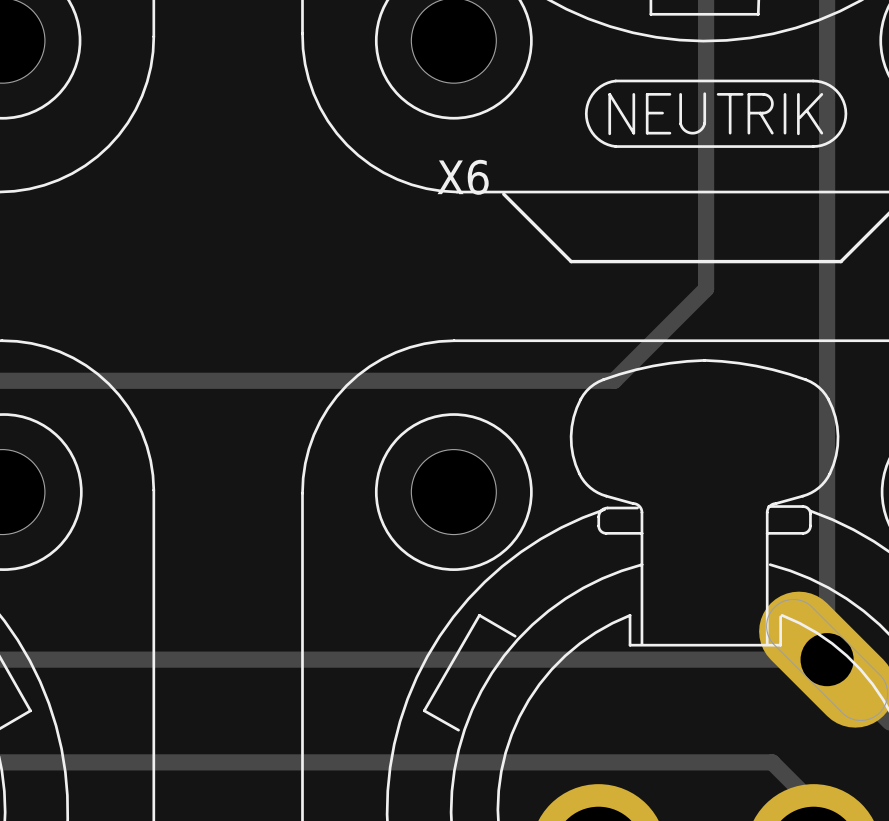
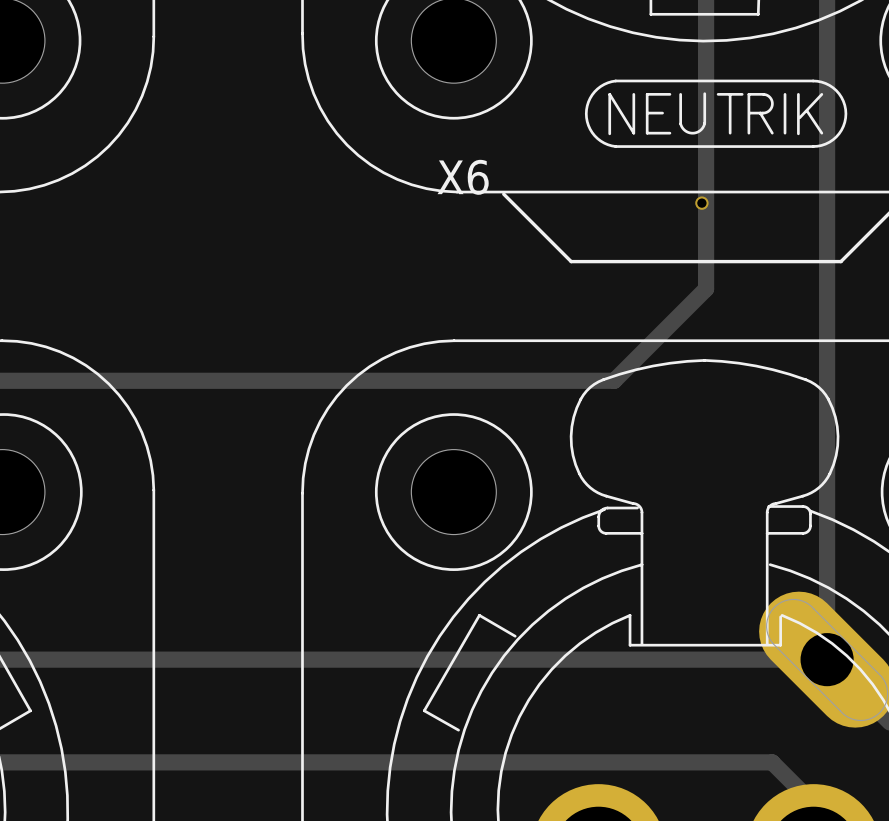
via: none -> (701, 203)

